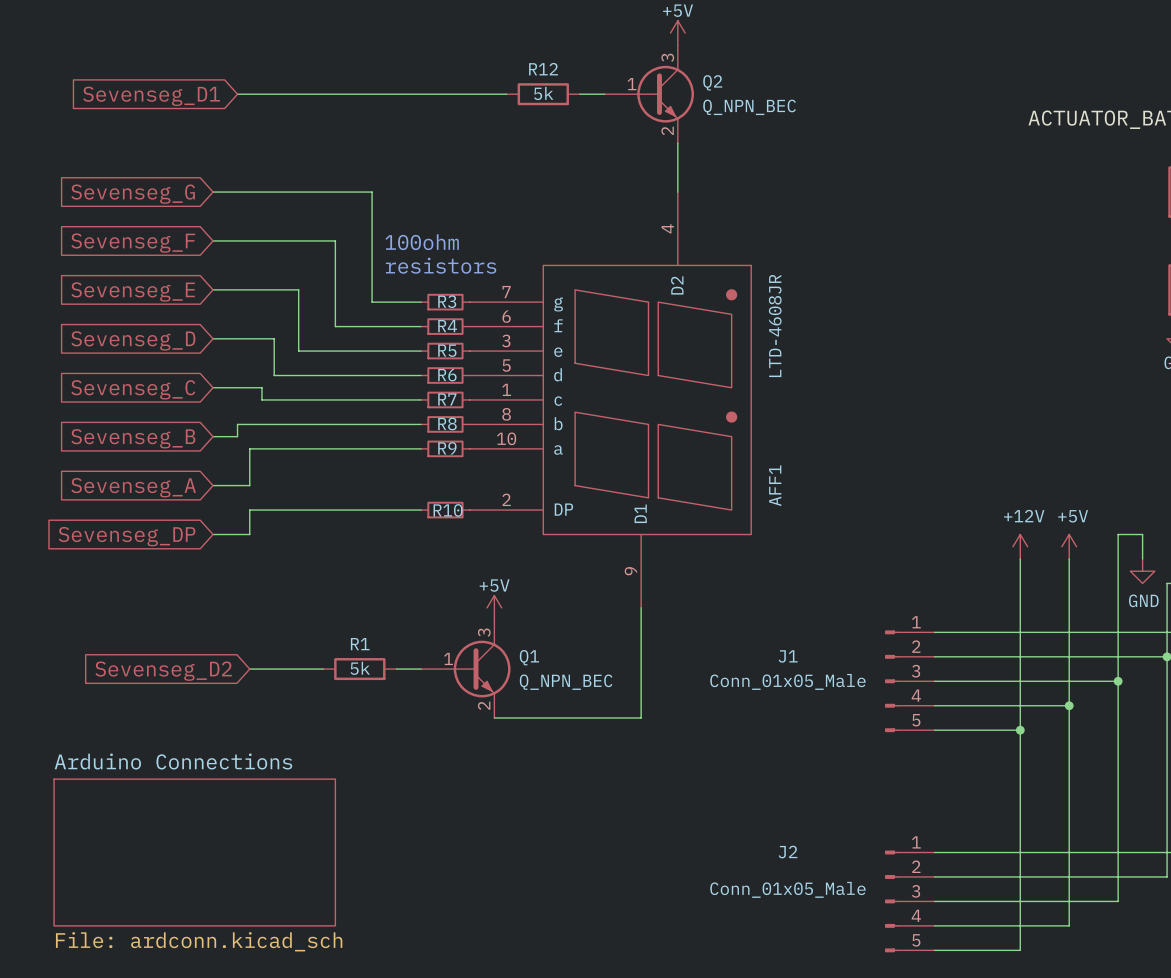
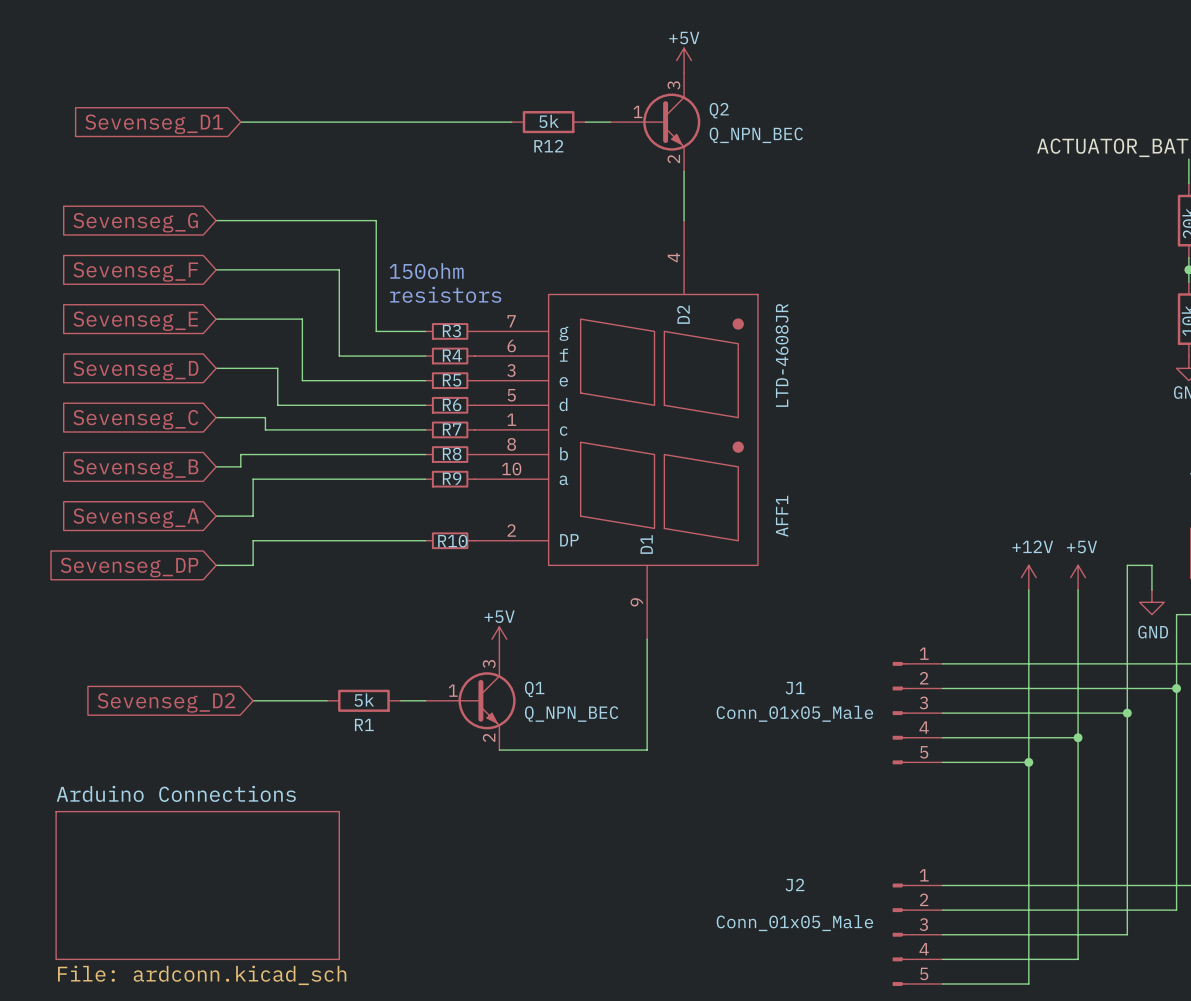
R12 name position: R12 (543, 69) -> R12 (548, 146)
text: 100ohm (422, 242) -> 150ohm (426, 271)
R1 name position: R1 (360, 644) -> R1 (364, 724)

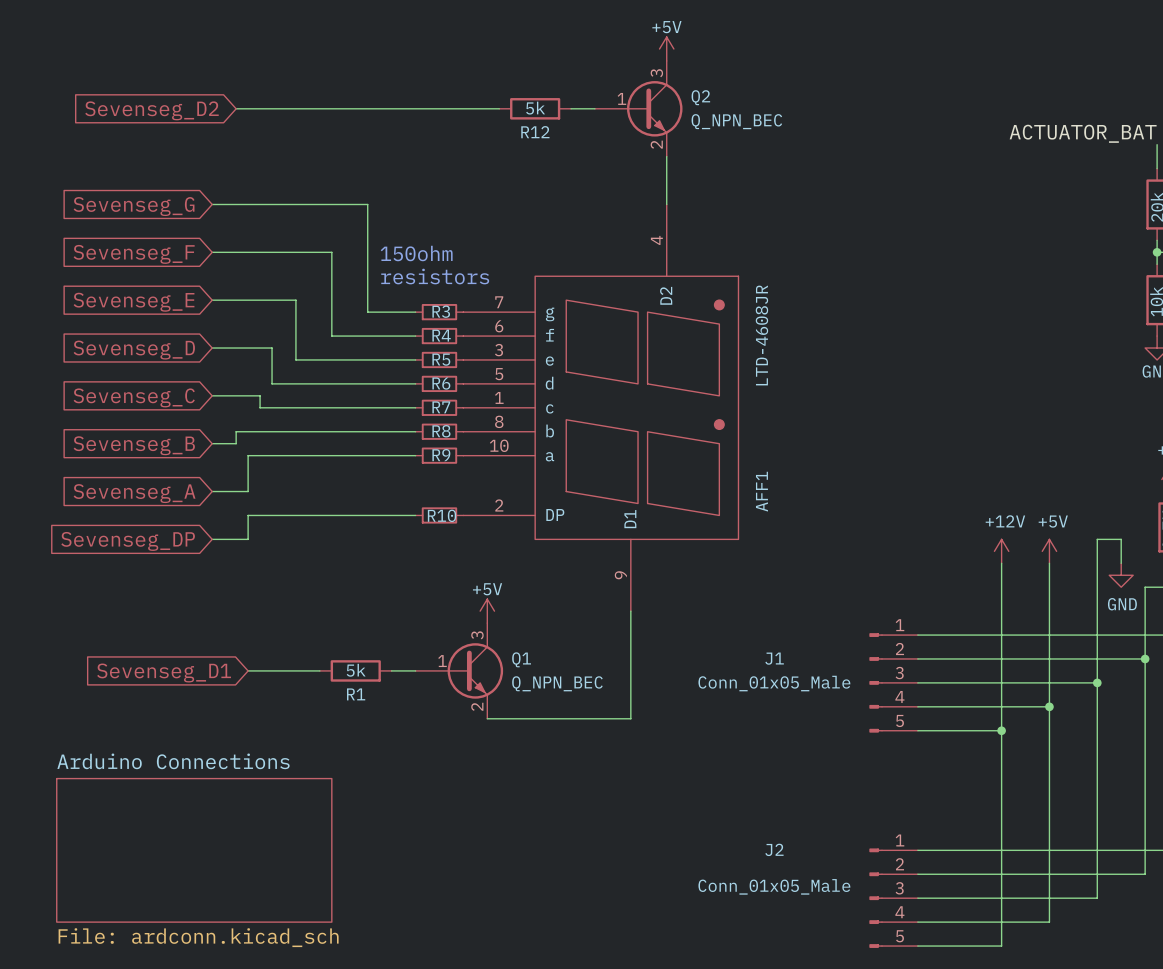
global label: Sevenseg_D1 (154, 124) -> Sevenseg_D2 (151, 110)
global label: Sevenseg_D2 (166, 702) -> Sevenseg_D1 (164, 673)

